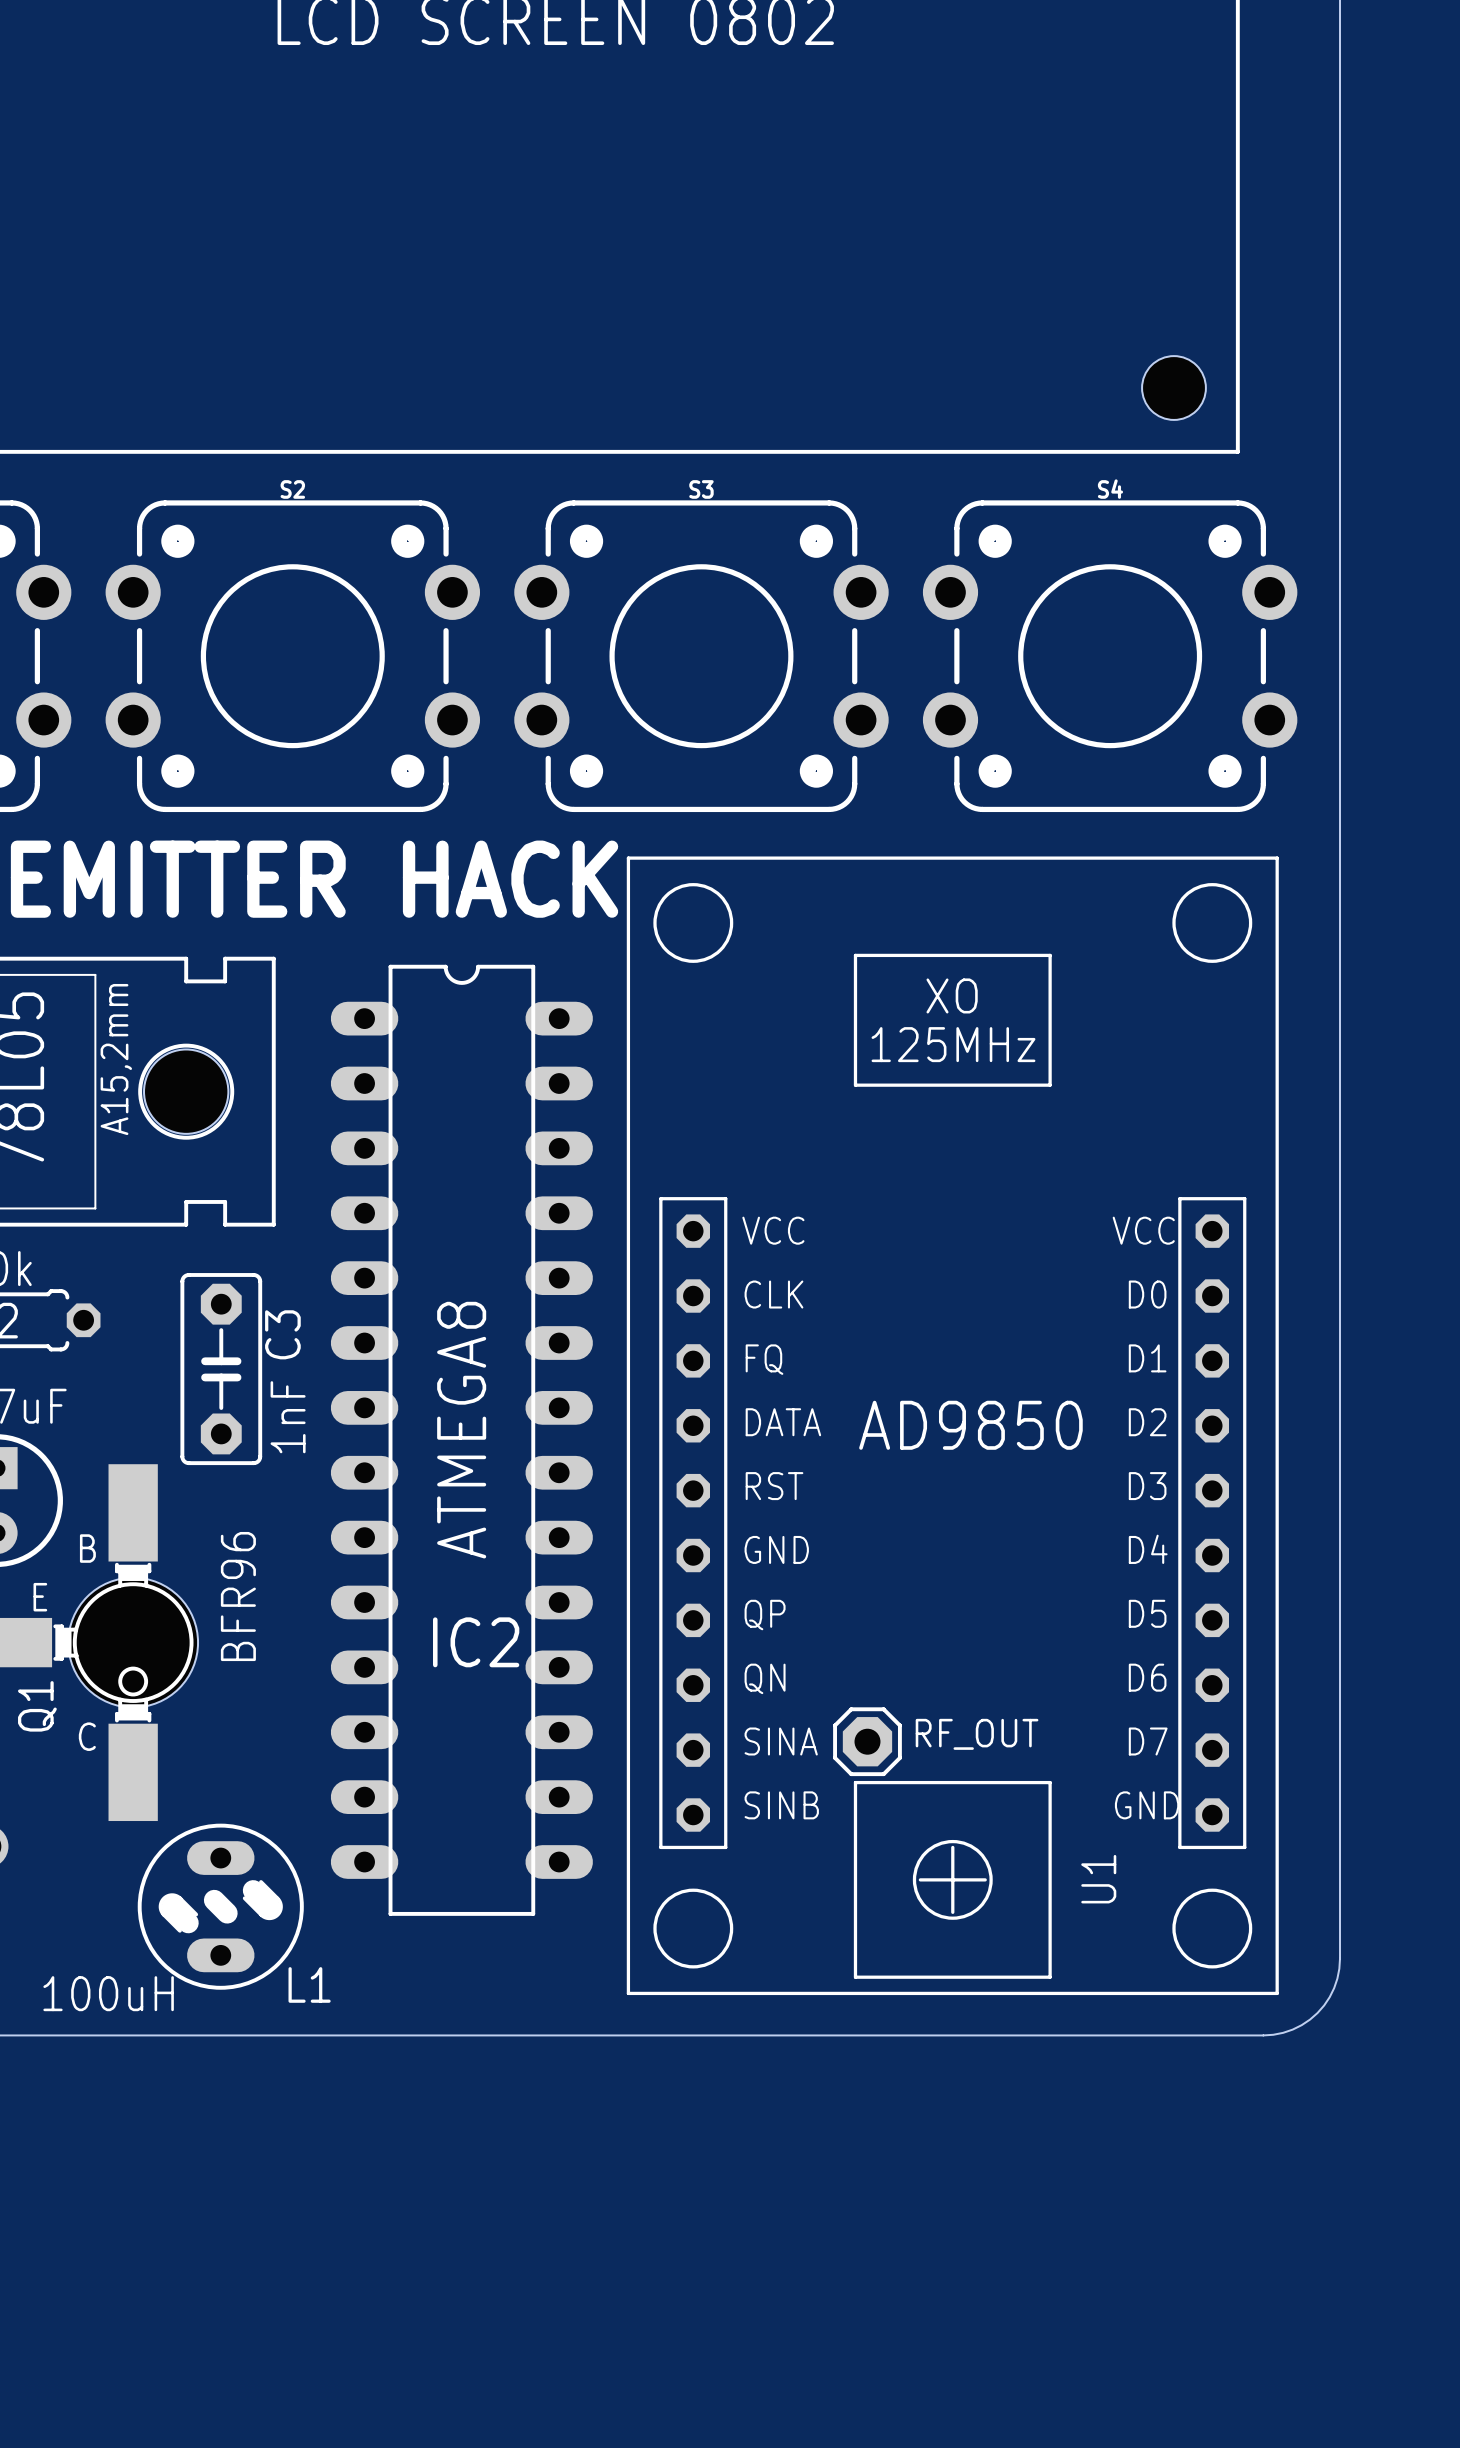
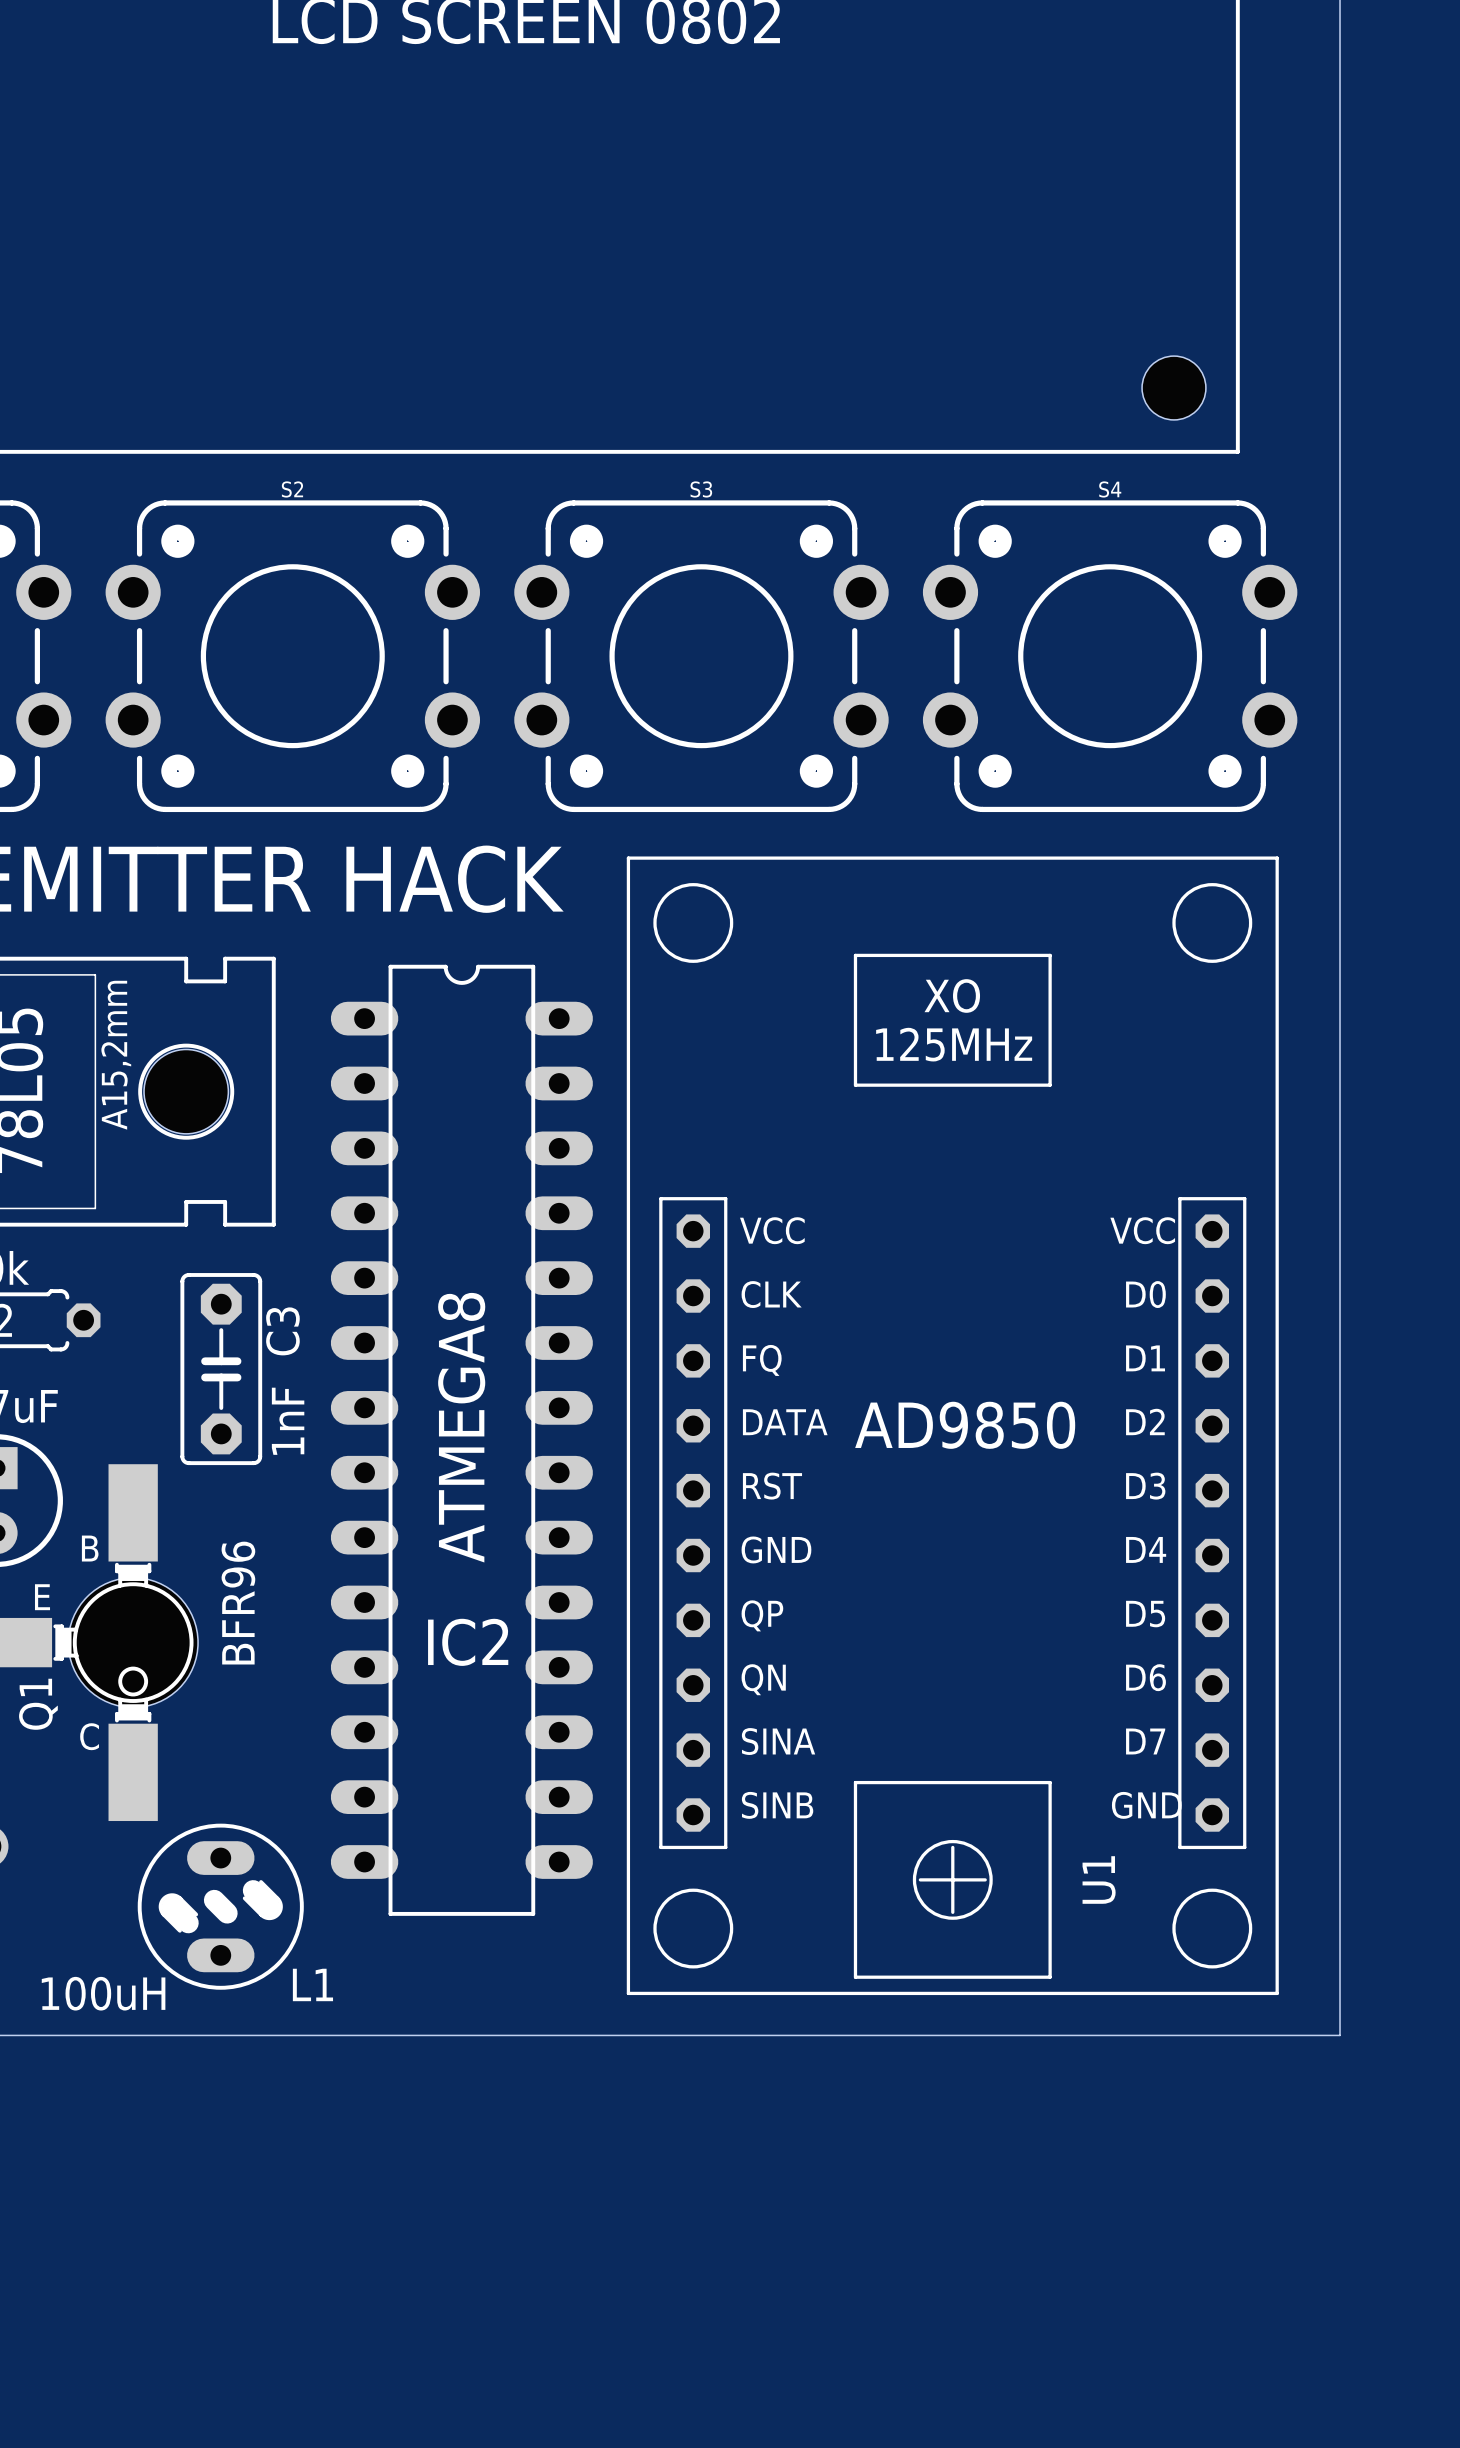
RF_OUT: (867, 1741) -> none
board edge: (1340, 1958) (1334, 1988) (1317, 2012) (1292, 2029) (1263, 2035) -> (1340, 1958) (1340, 2035) (1263, 2035)

